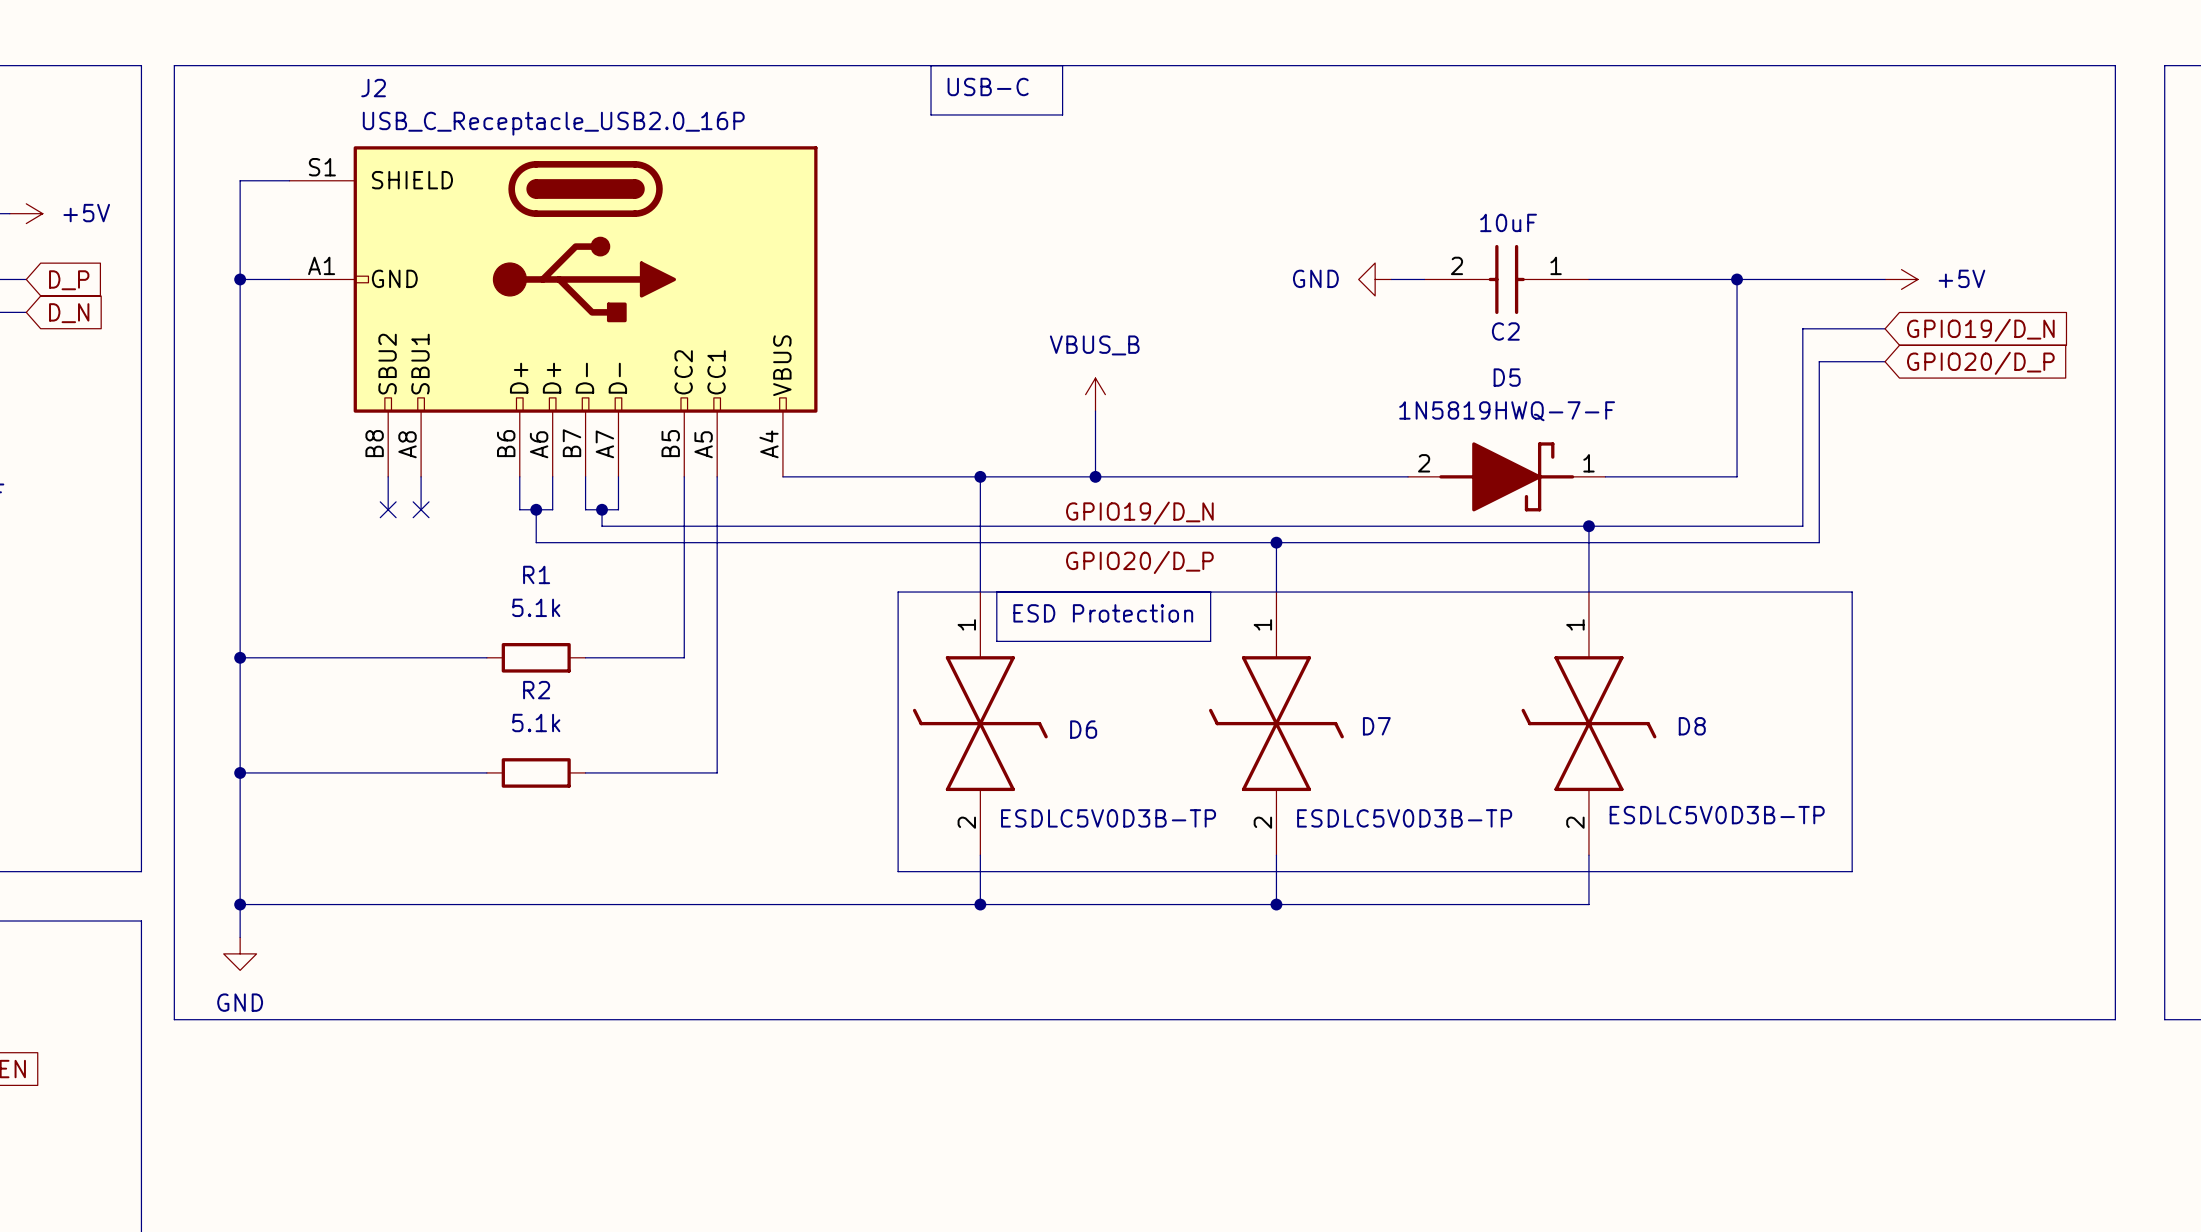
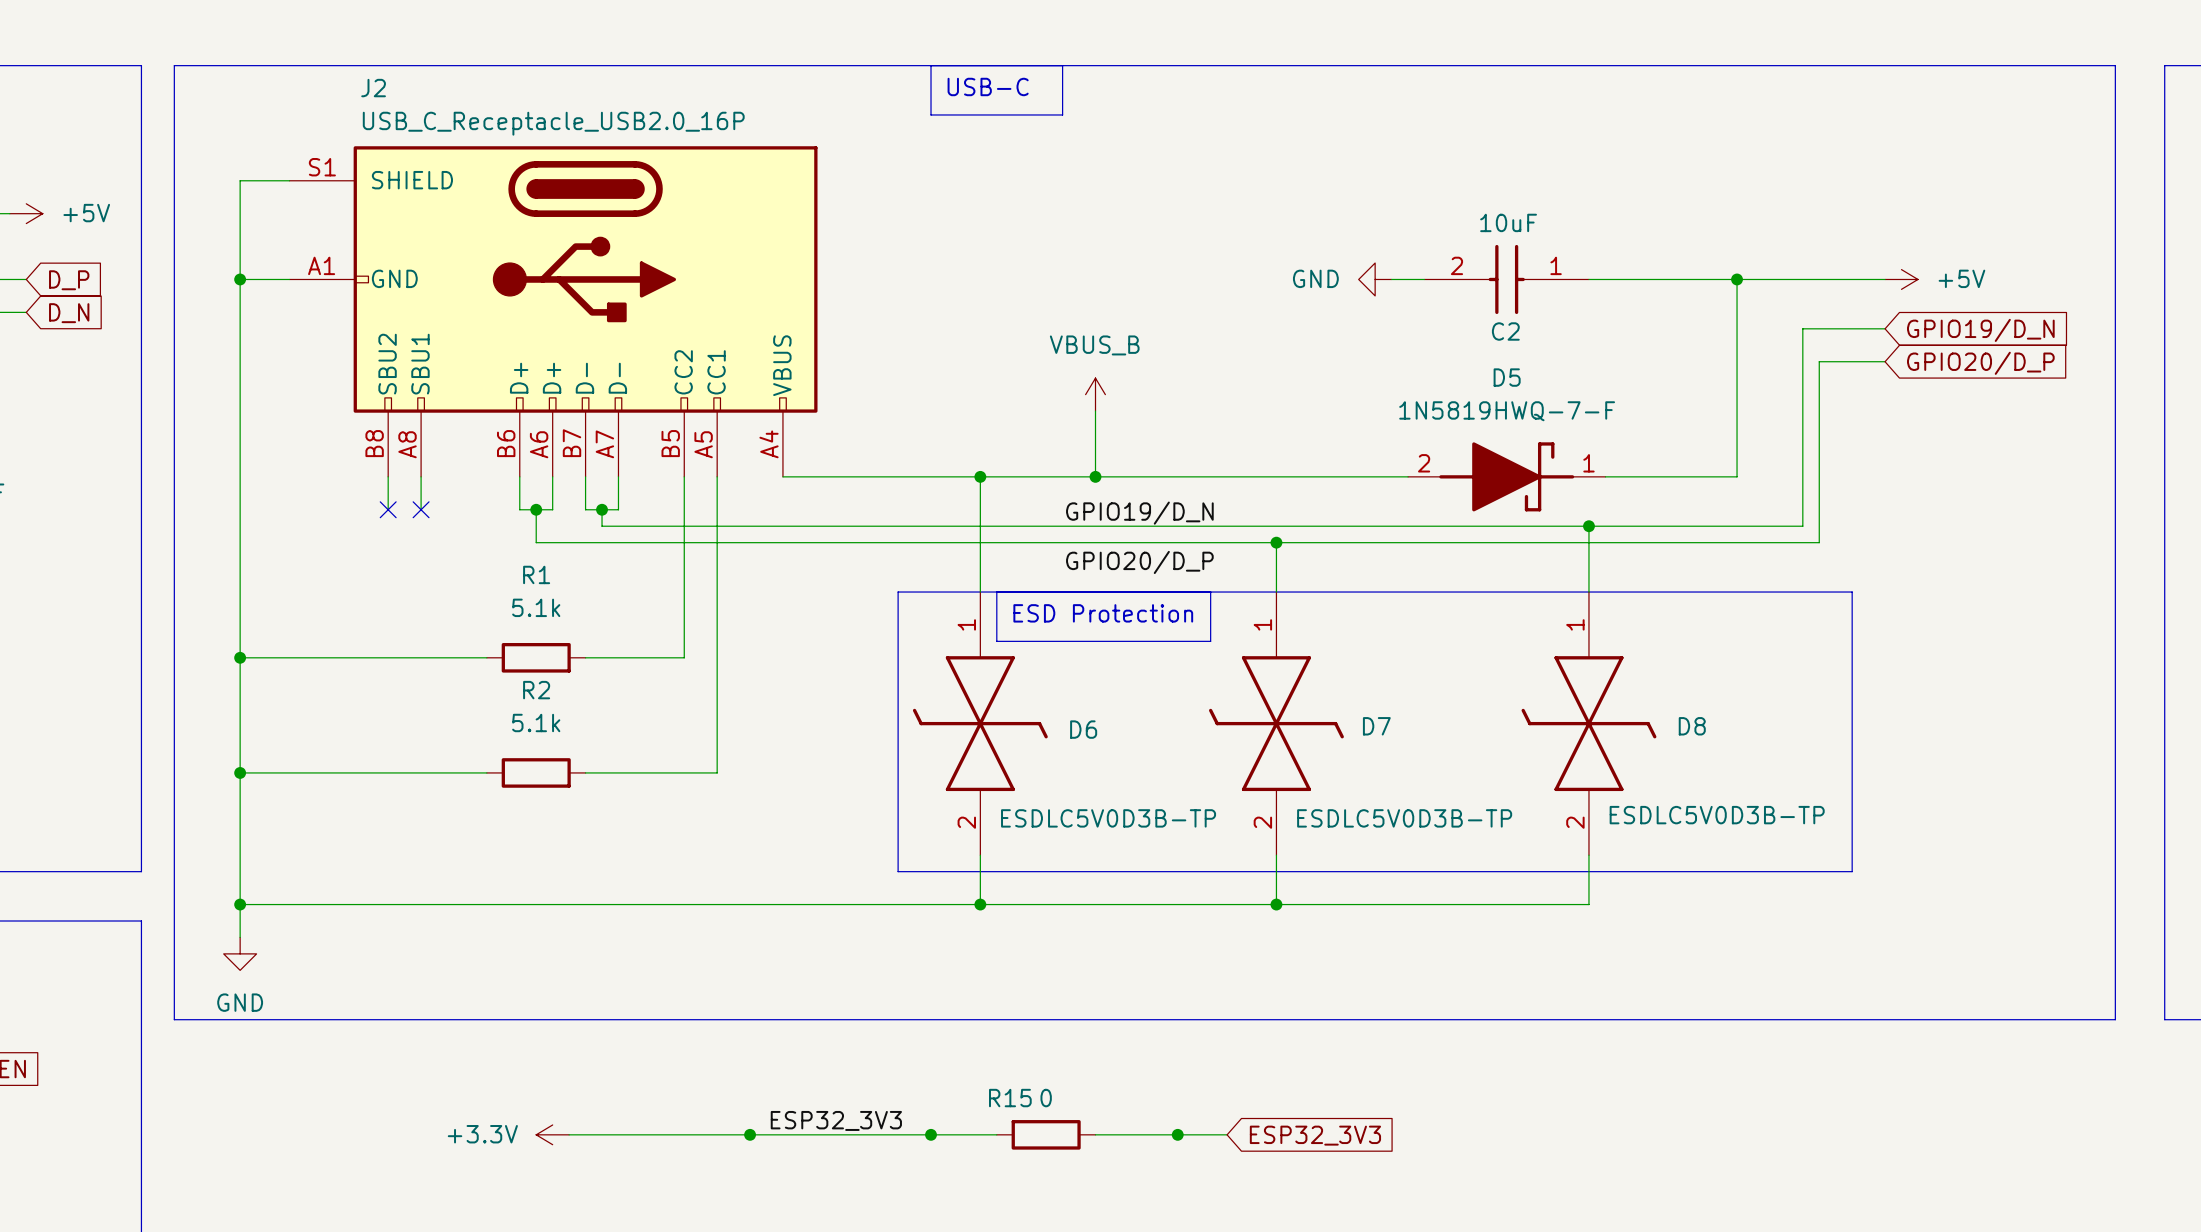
label: none -> ESP32_3V3 (836, 1120)
power symbol: none -> +3.3V (552, 1134)
wire: none -> (569, 1134) (996, 1134)
junction: none -> (750, 1134)
junction: none -> (931, 1134)
R15: none -> 0 (1046, 1134)
wire: none -> (1095, 1134) (1227, 1134)
junction: none -> (1177, 1134)
global label: none -> ESP32_3V3 (1315, 1135)

